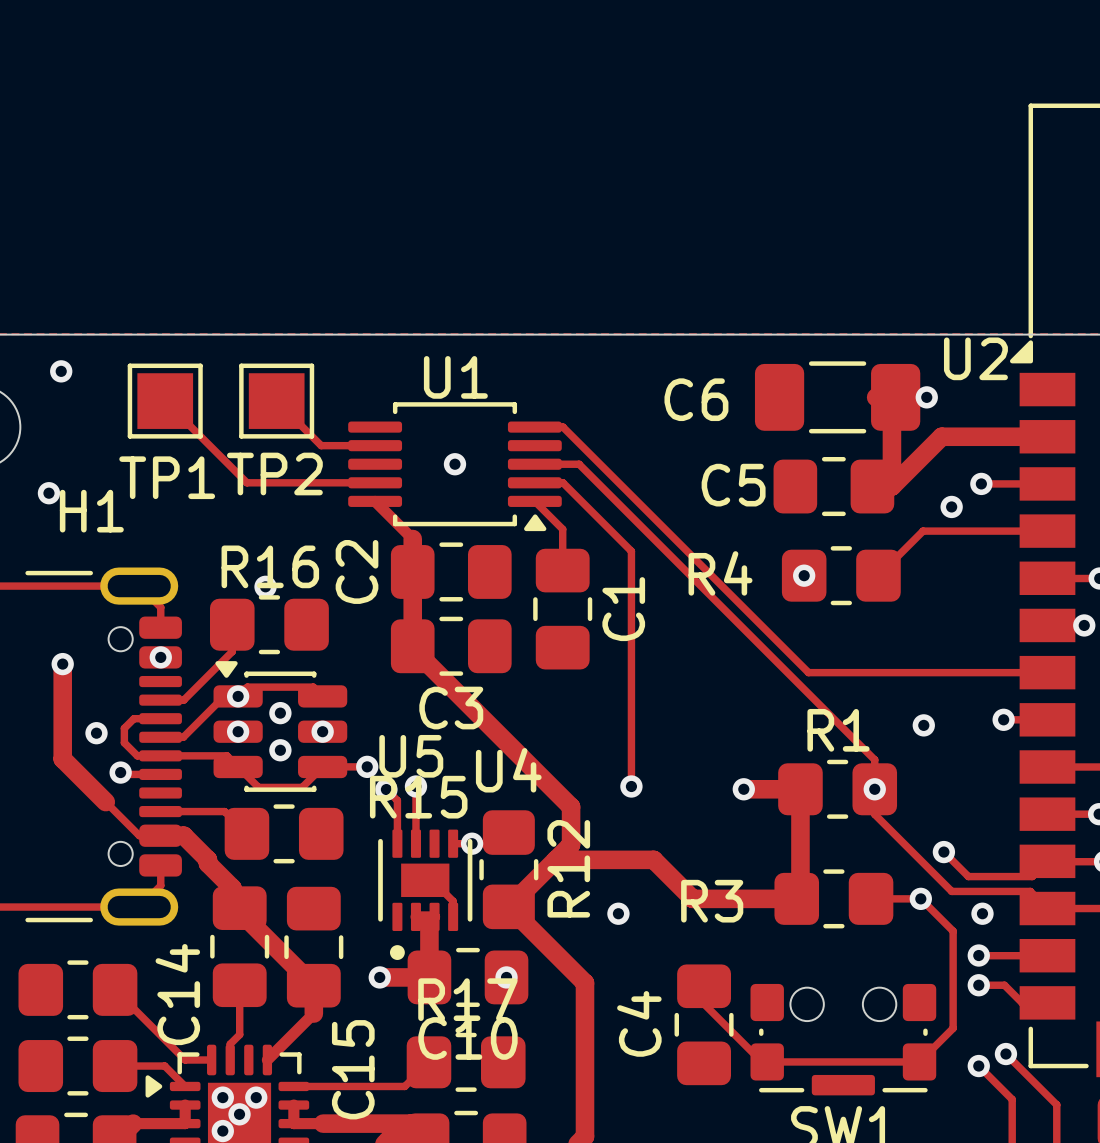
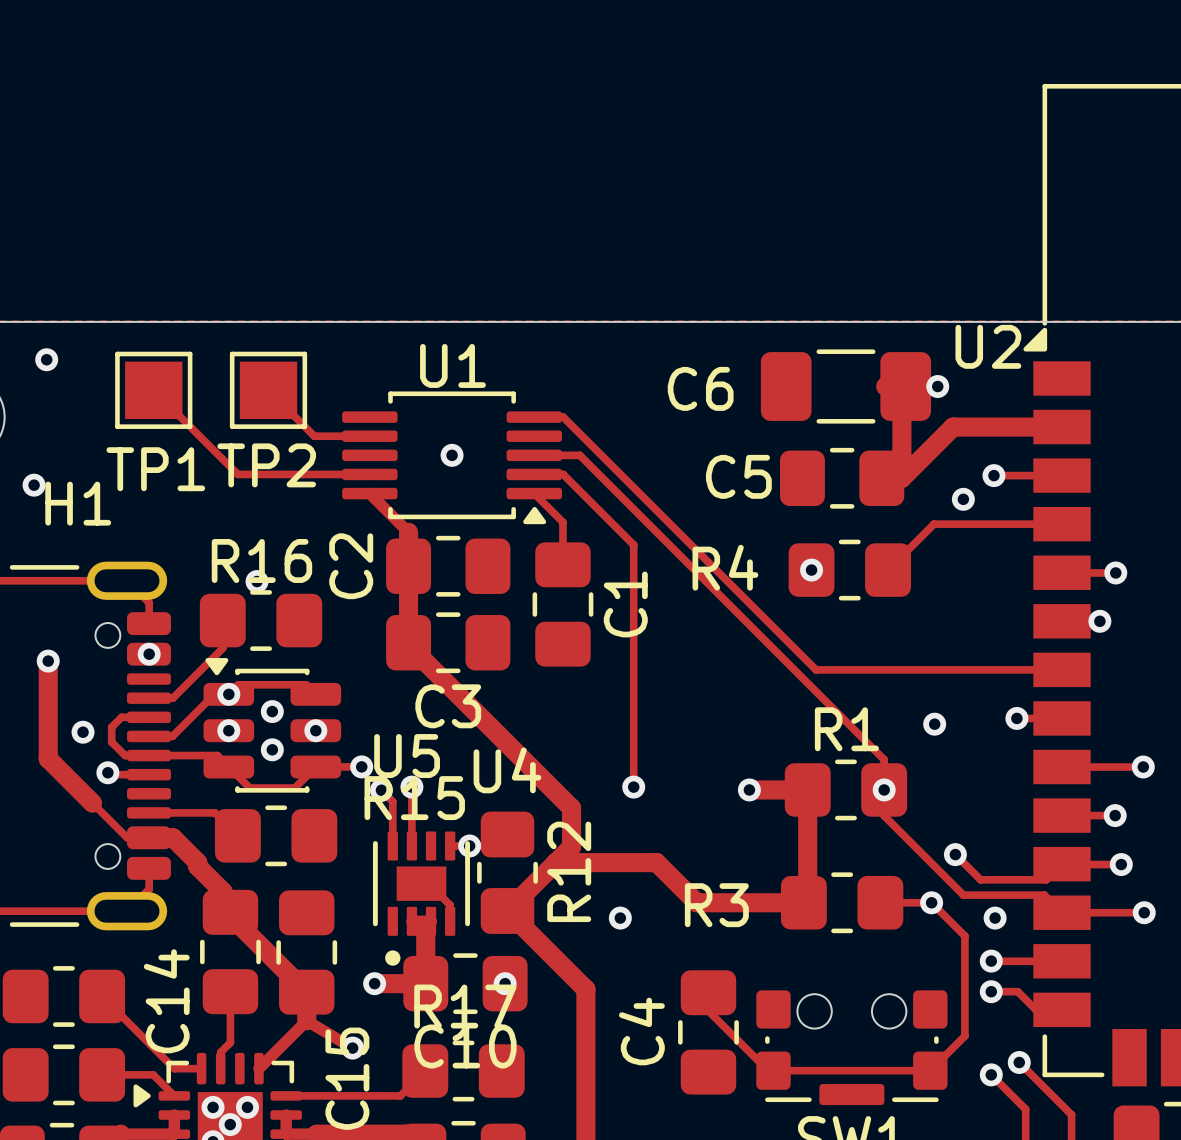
track: none -> (306, 1020) (352, 1048)
via: none -> (352, 1048)

